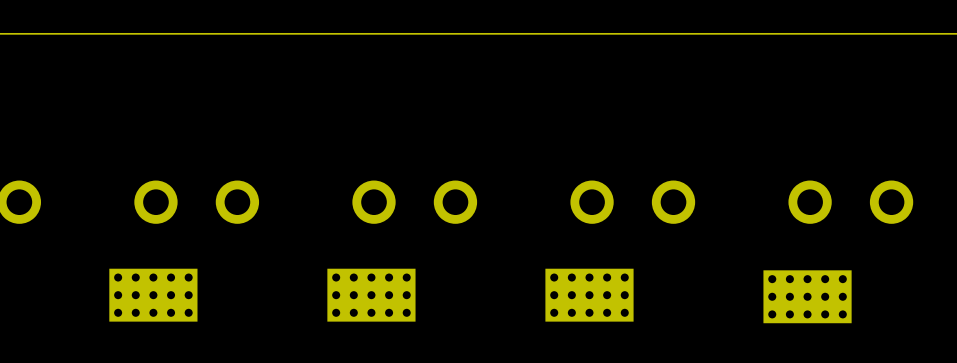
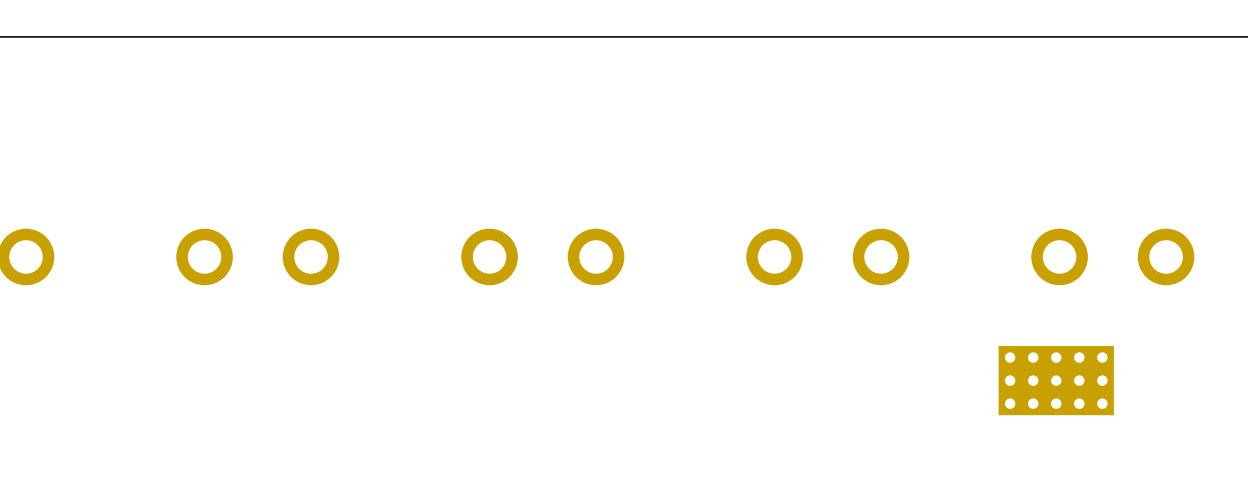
part: (153, 295) -> none
part: (371, 295) -> none
part: (589, 295) -> none

